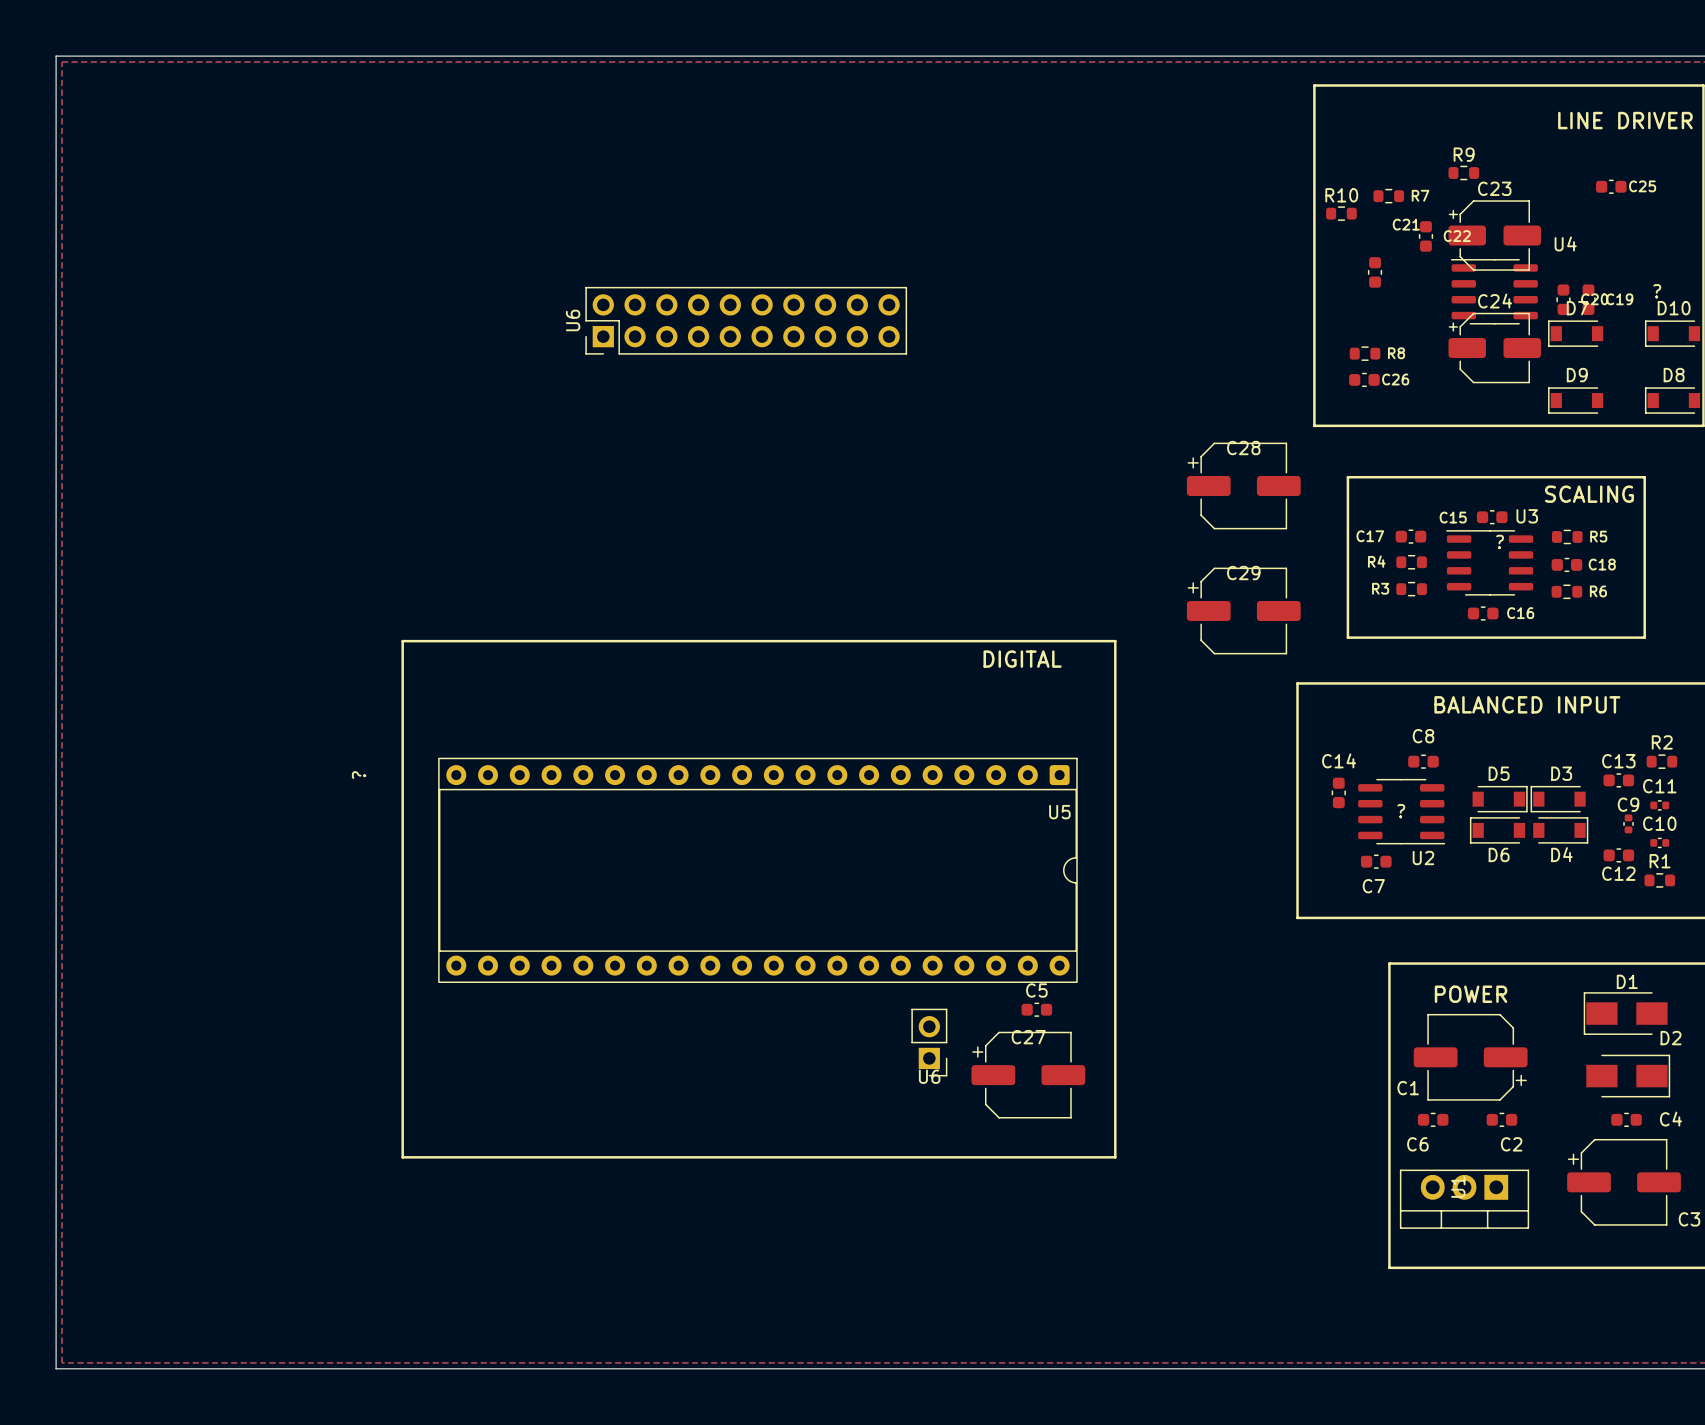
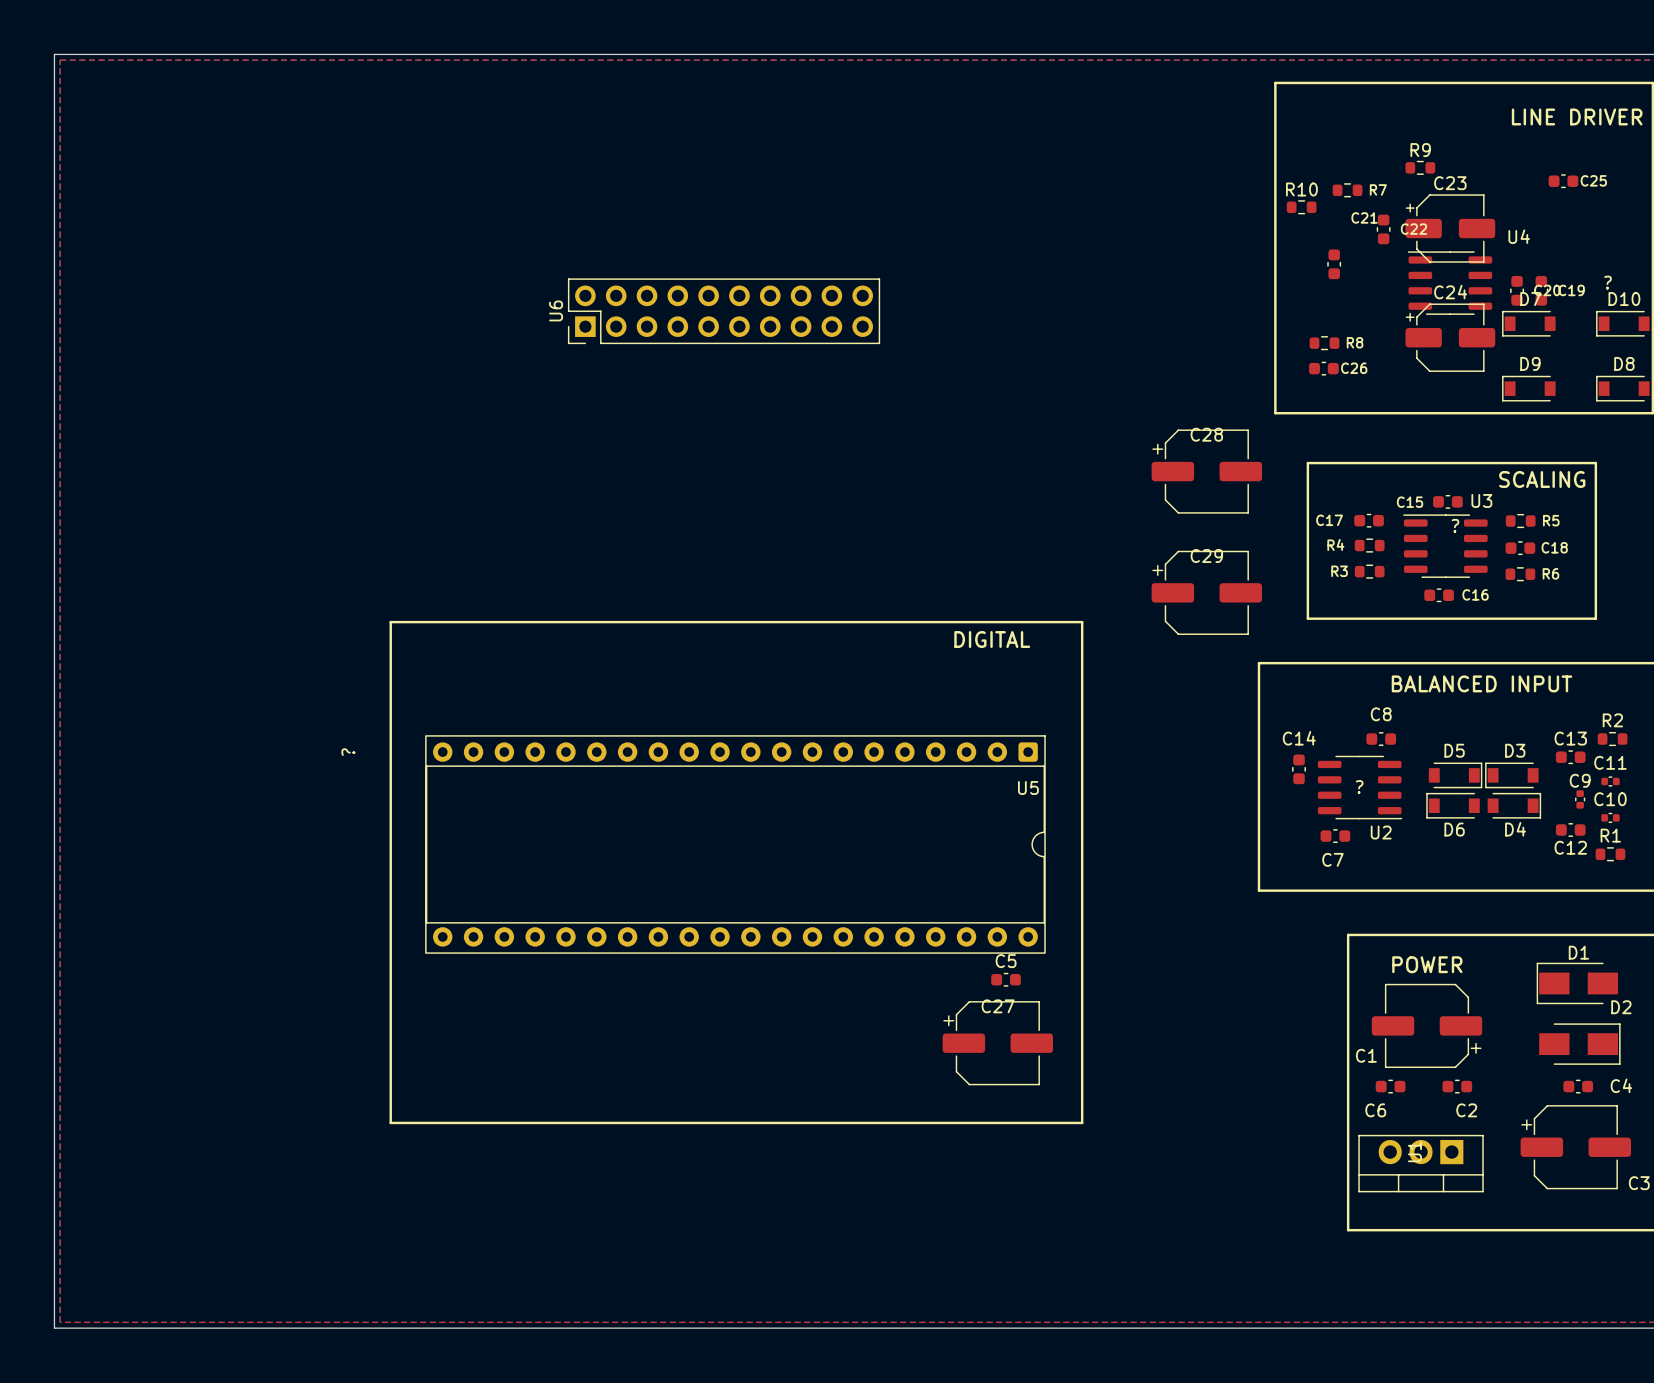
U6: (929, 1042) -> none

